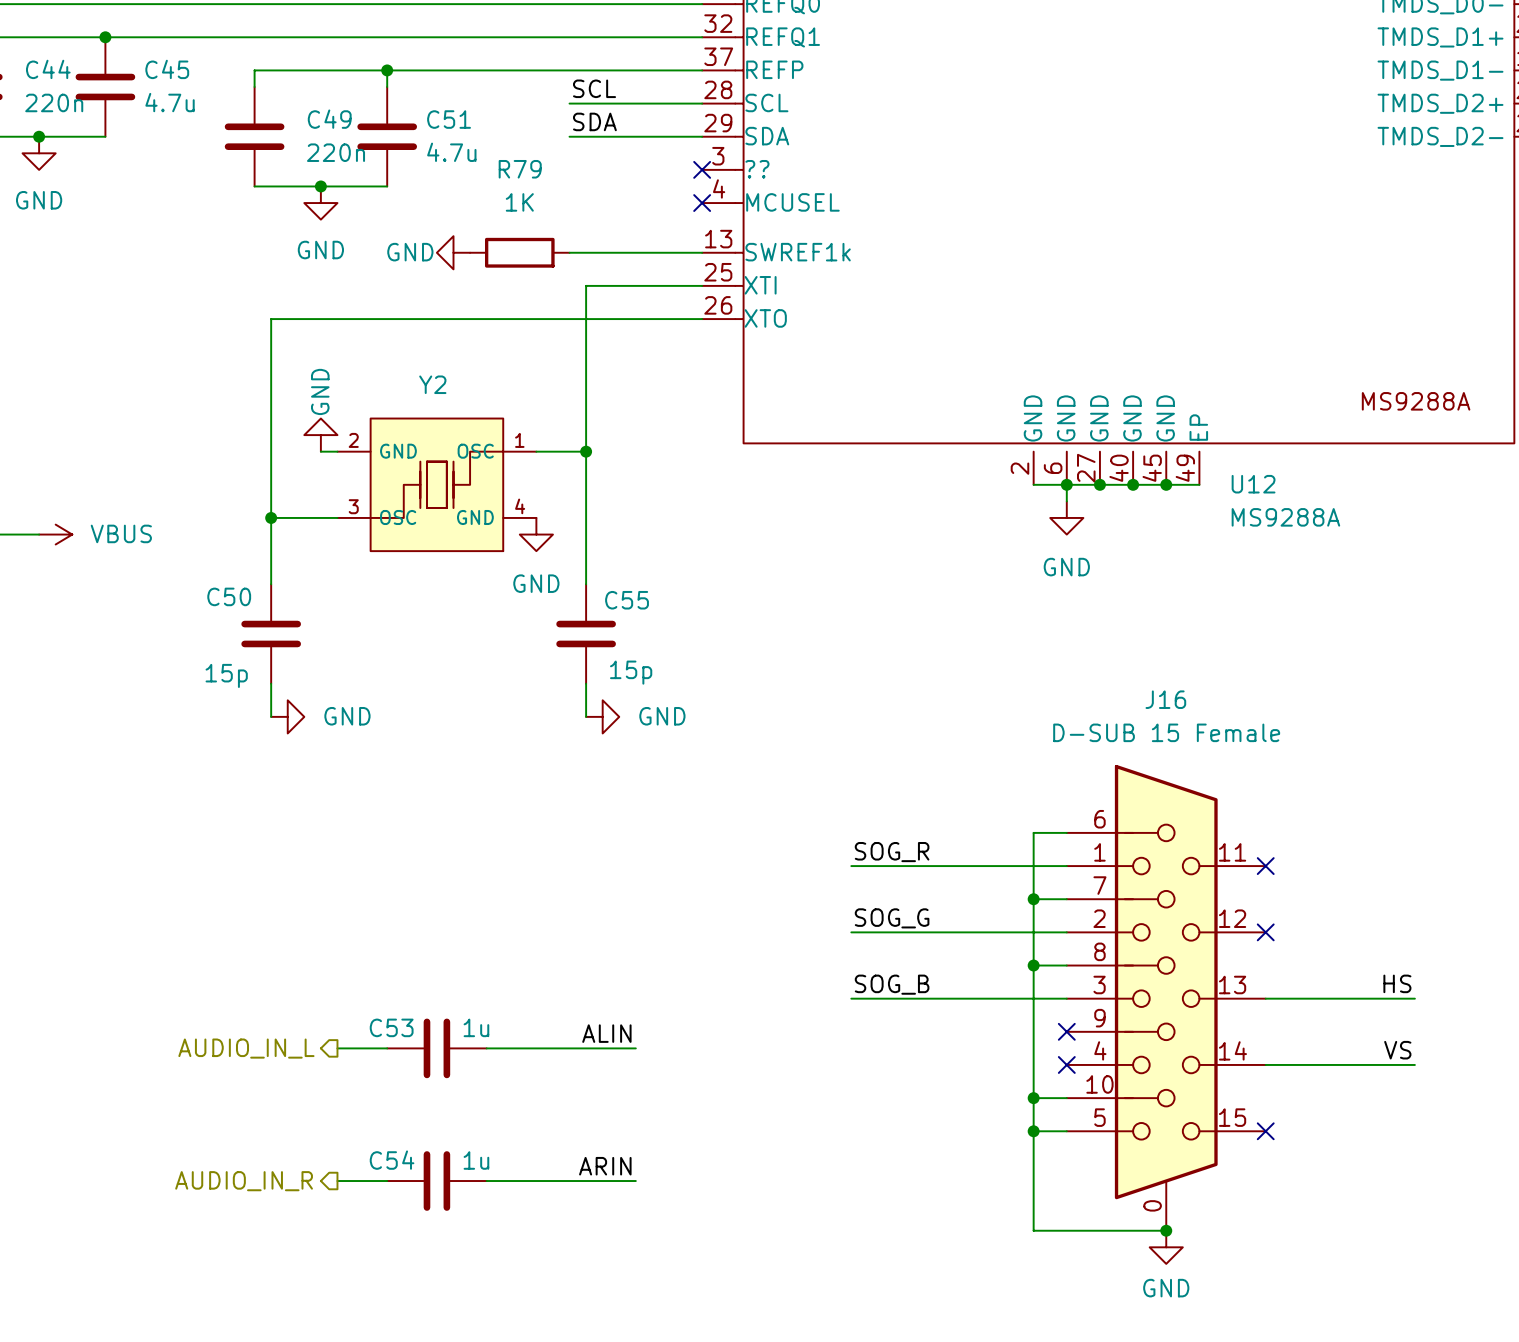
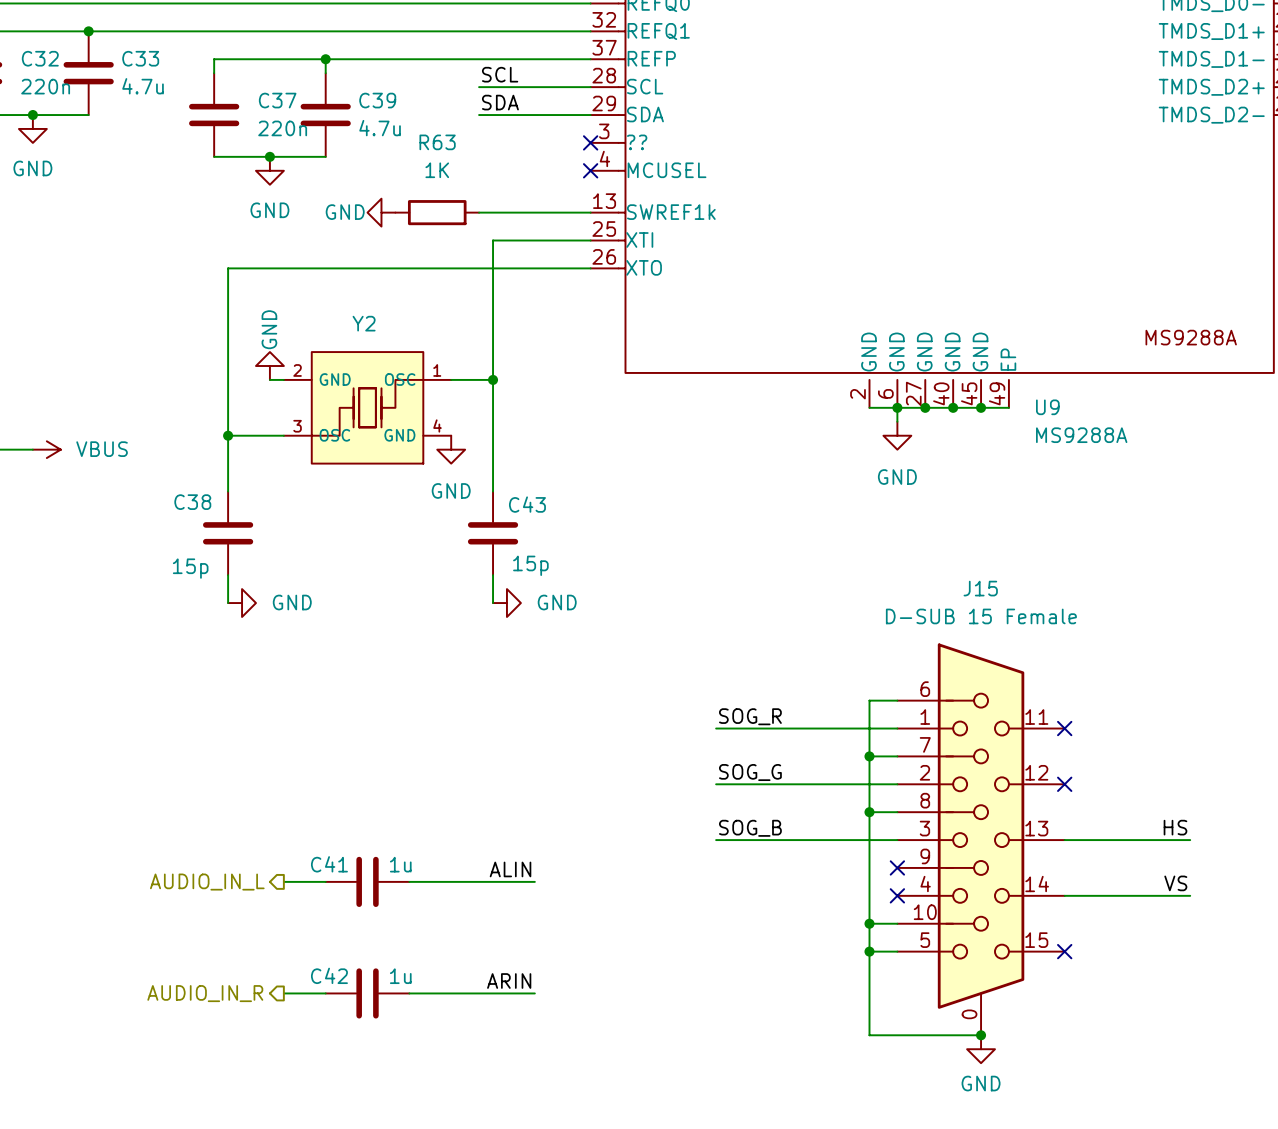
C44 name: C44 (48, 69) -> C32 (40, 58)
C45 name: C45 (167, 69) -> C33 (140, 58)
C49 name: C49 (329, 119) -> C37 (277, 100)
C51 name: C51 (449, 119) -> C39 (377, 100)
R79 name: R79 (520, 169) -> R63 (437, 142)
U12 name: U12 (1253, 484) -> U9 (1047, 407)
C50 name: C50 (229, 596) -> C38 (192, 502)
C55 name: C55 (627, 600) -> C43 (527, 504)
J16 name: J16 (1165, 699) -> J15 (980, 588)
C53 name: C53 (391, 1027) -> C41 (329, 864)
C54 name: C54 (392, 1160) -> C42 (329, 975)

